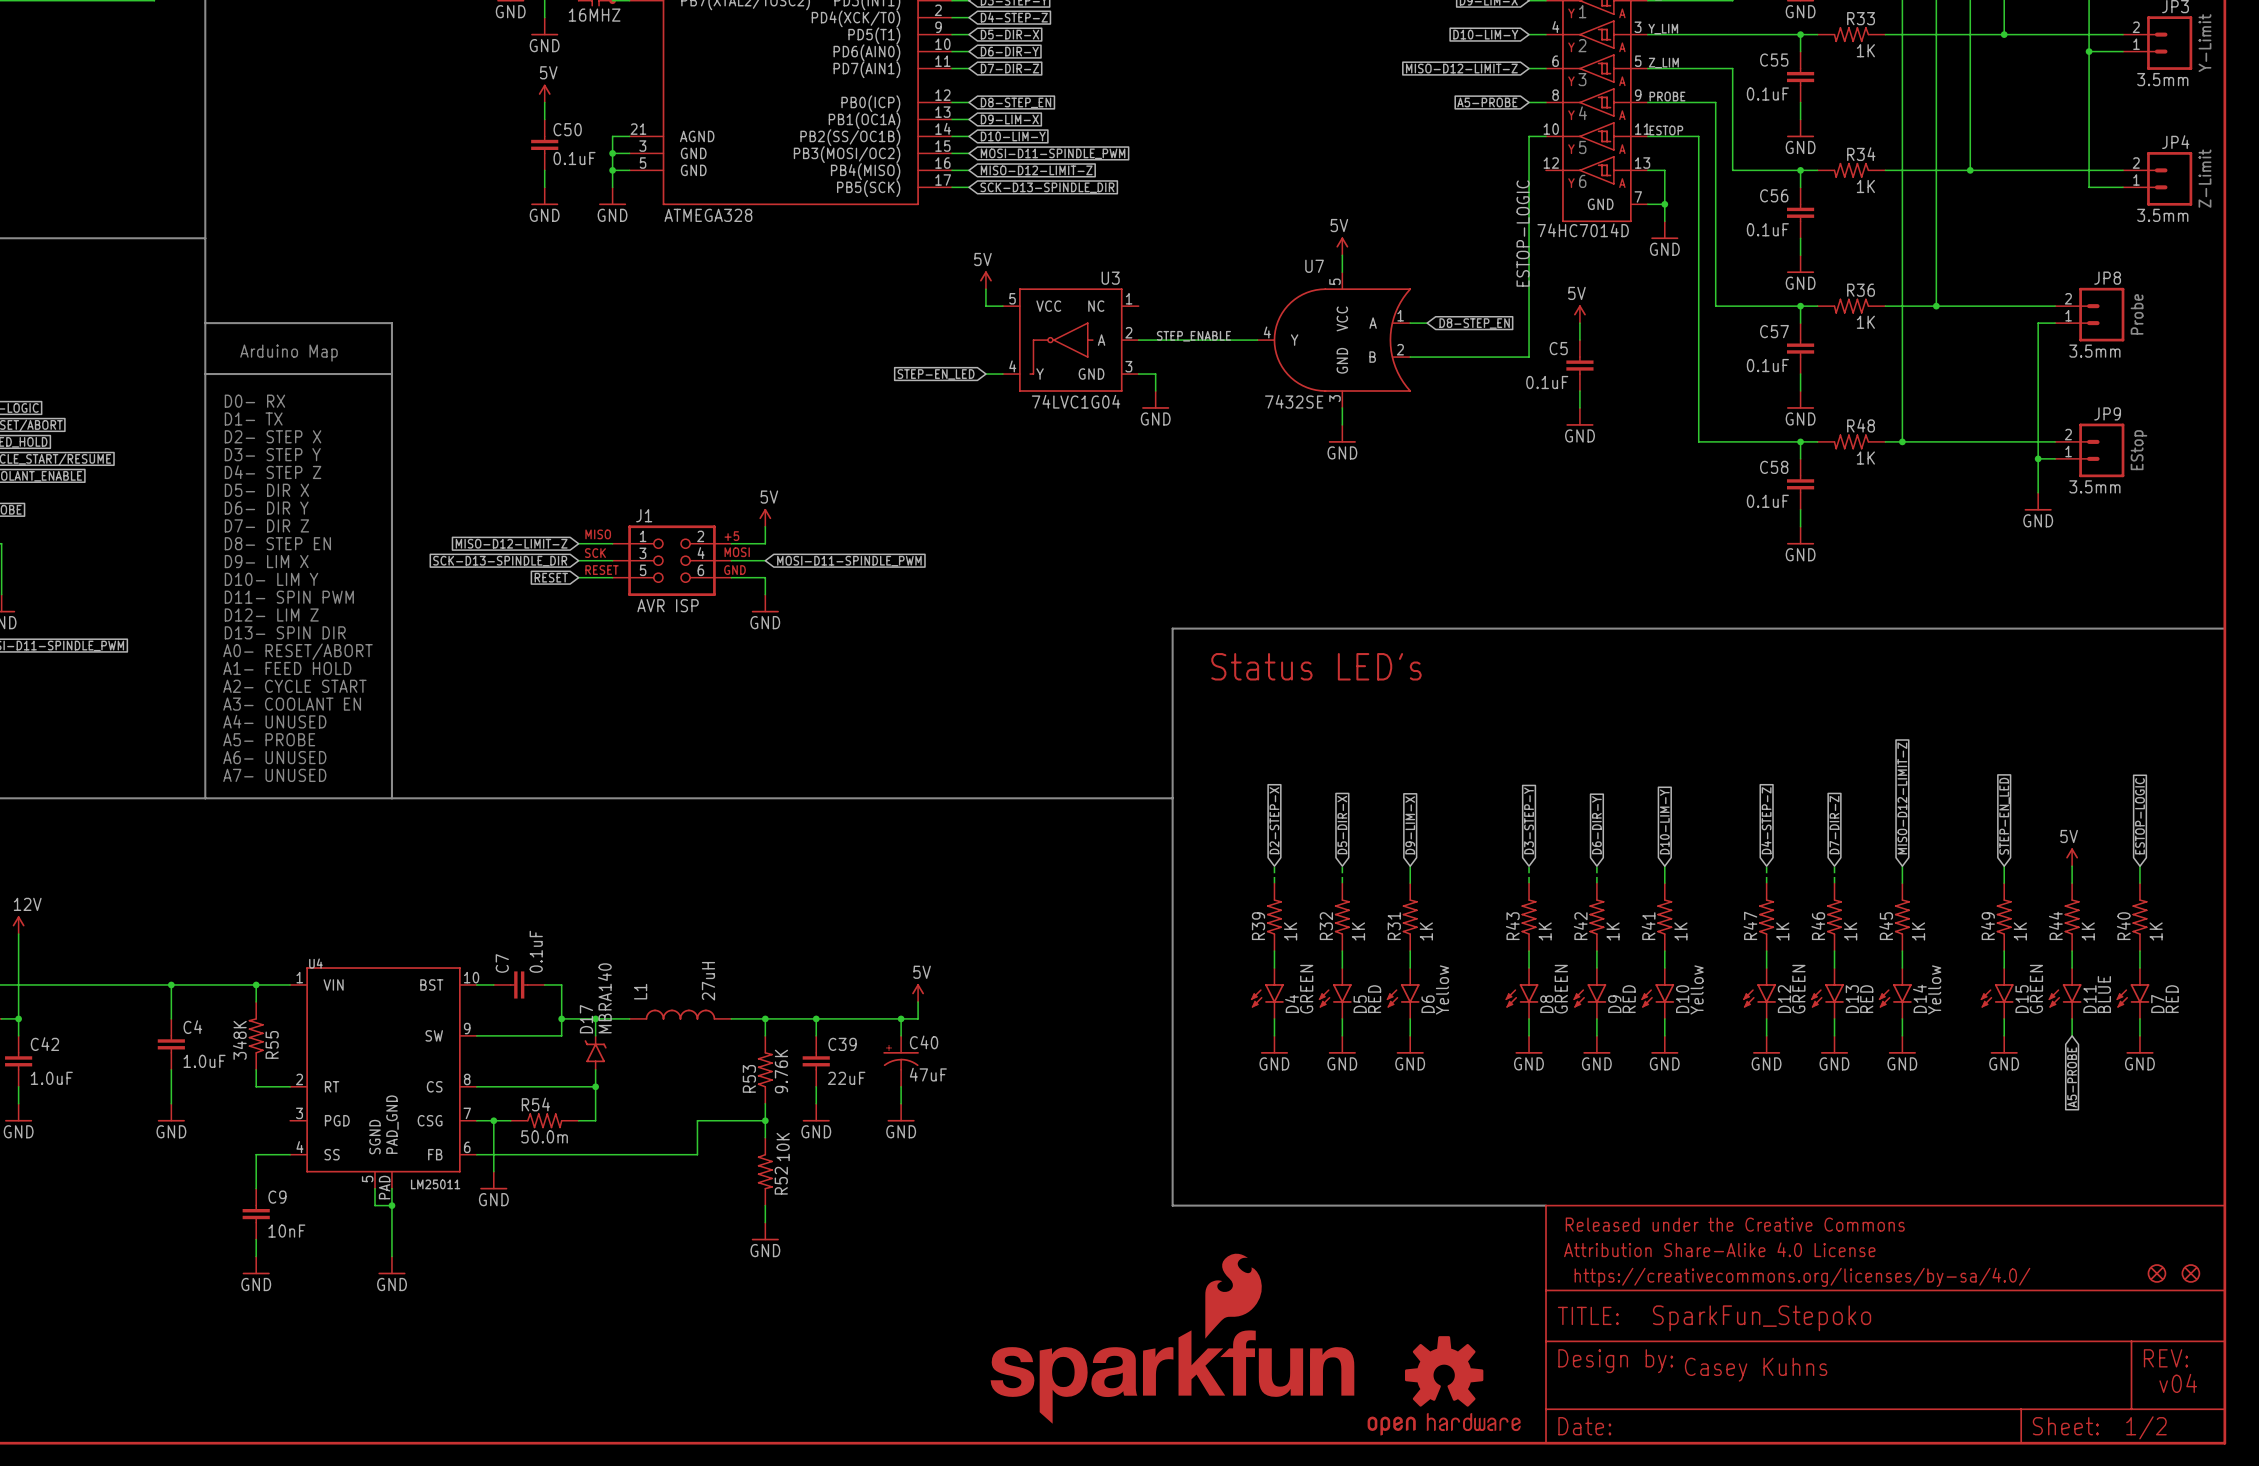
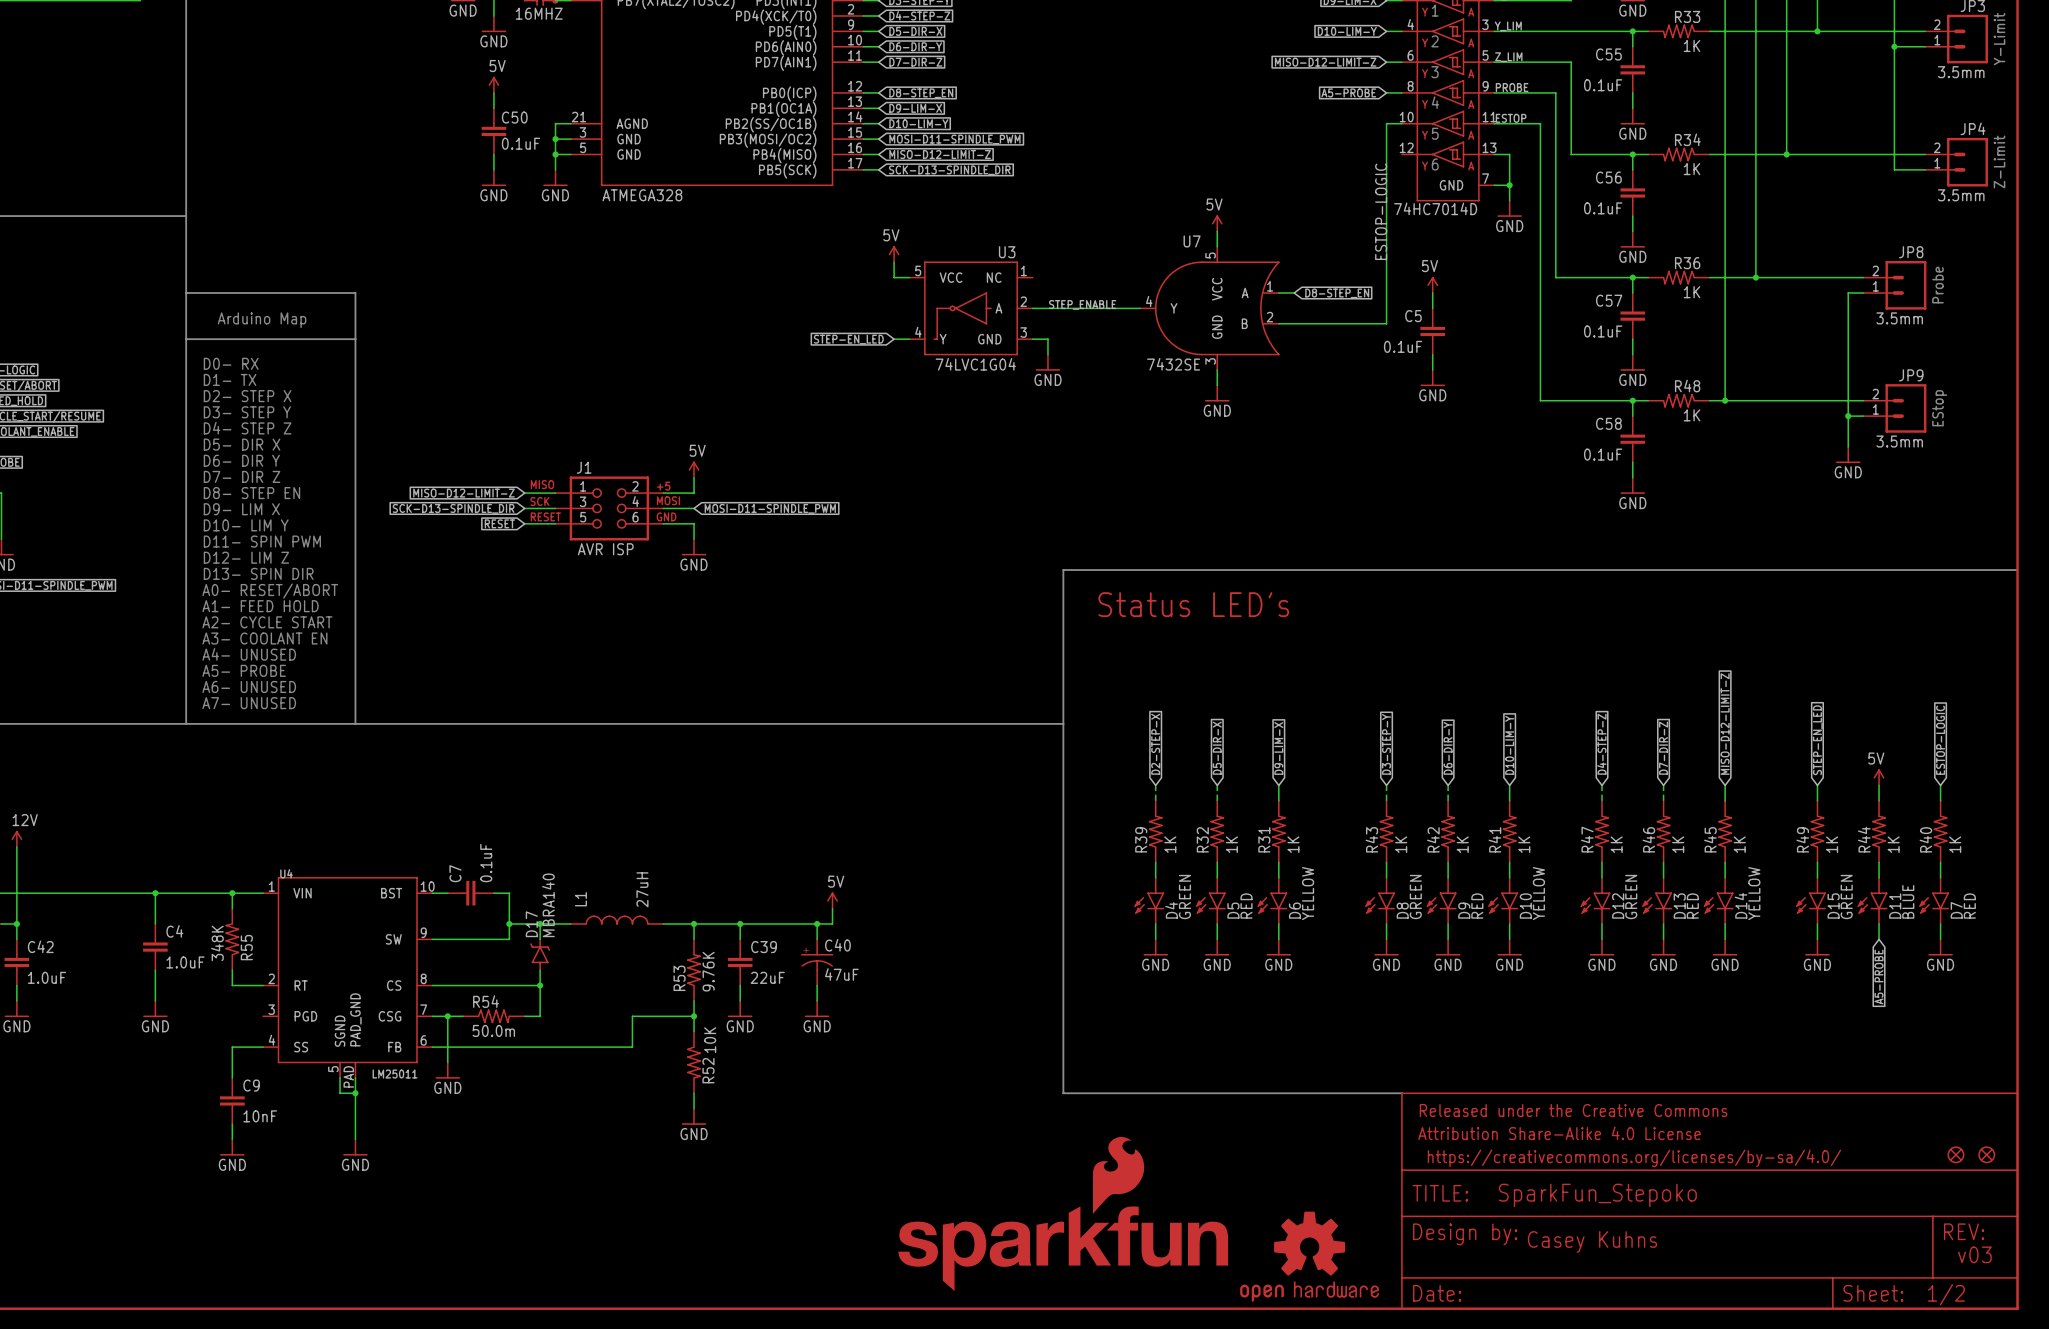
D6 value: Yellow (1442, 989) -> YELLOW (1308, 893)
D10 value: Yellow (1697, 989) -> YELLOW (1538, 893)
D14 value: Yellow (1934, 989) -> YELLOW (1754, 893)
text: v04 (2178, 1383) -> v03 (1974, 1254)

